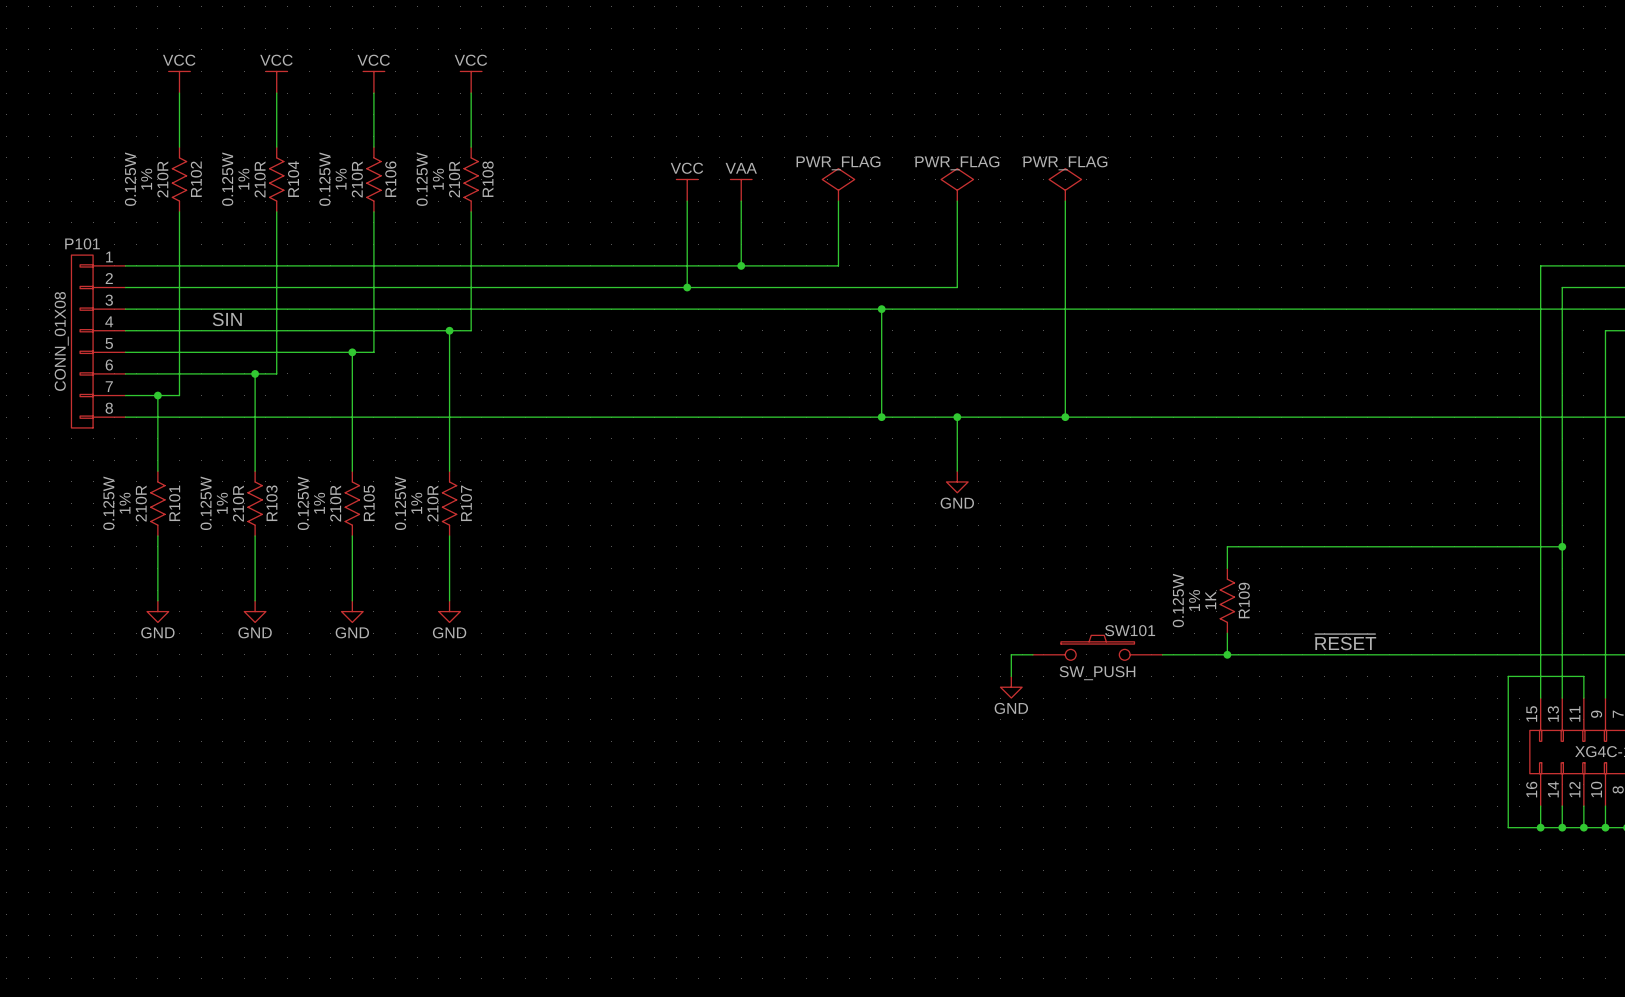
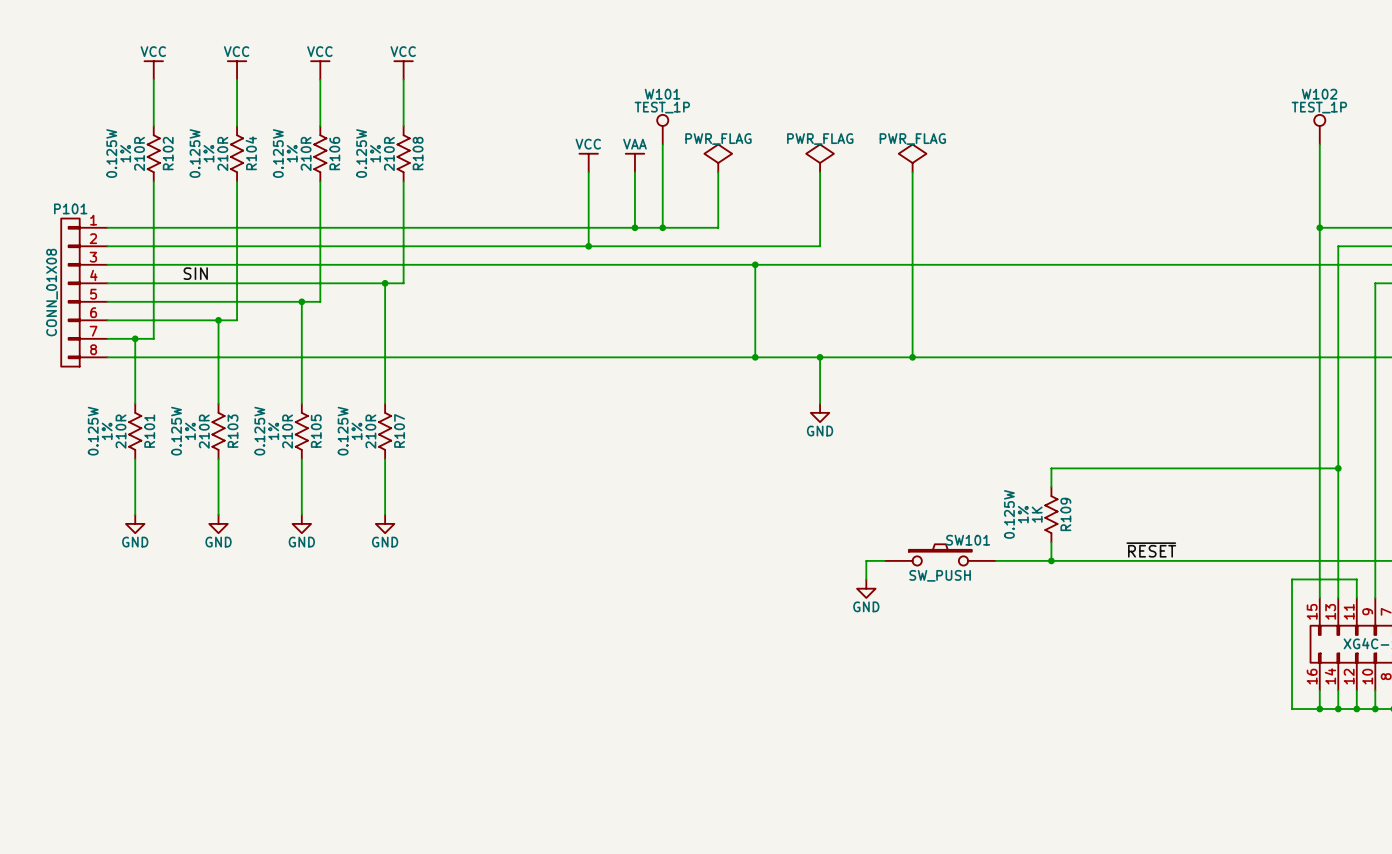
W101: none -> TEST_1P (662, 129)
W102: none -> TEST_1P (1319, 129)
wire: none -> (662, 144) (662, 227)
wire: none -> (1319, 144) (1319, 227)
junction: none -> (662, 227)
junction: none -> (1319, 227)

